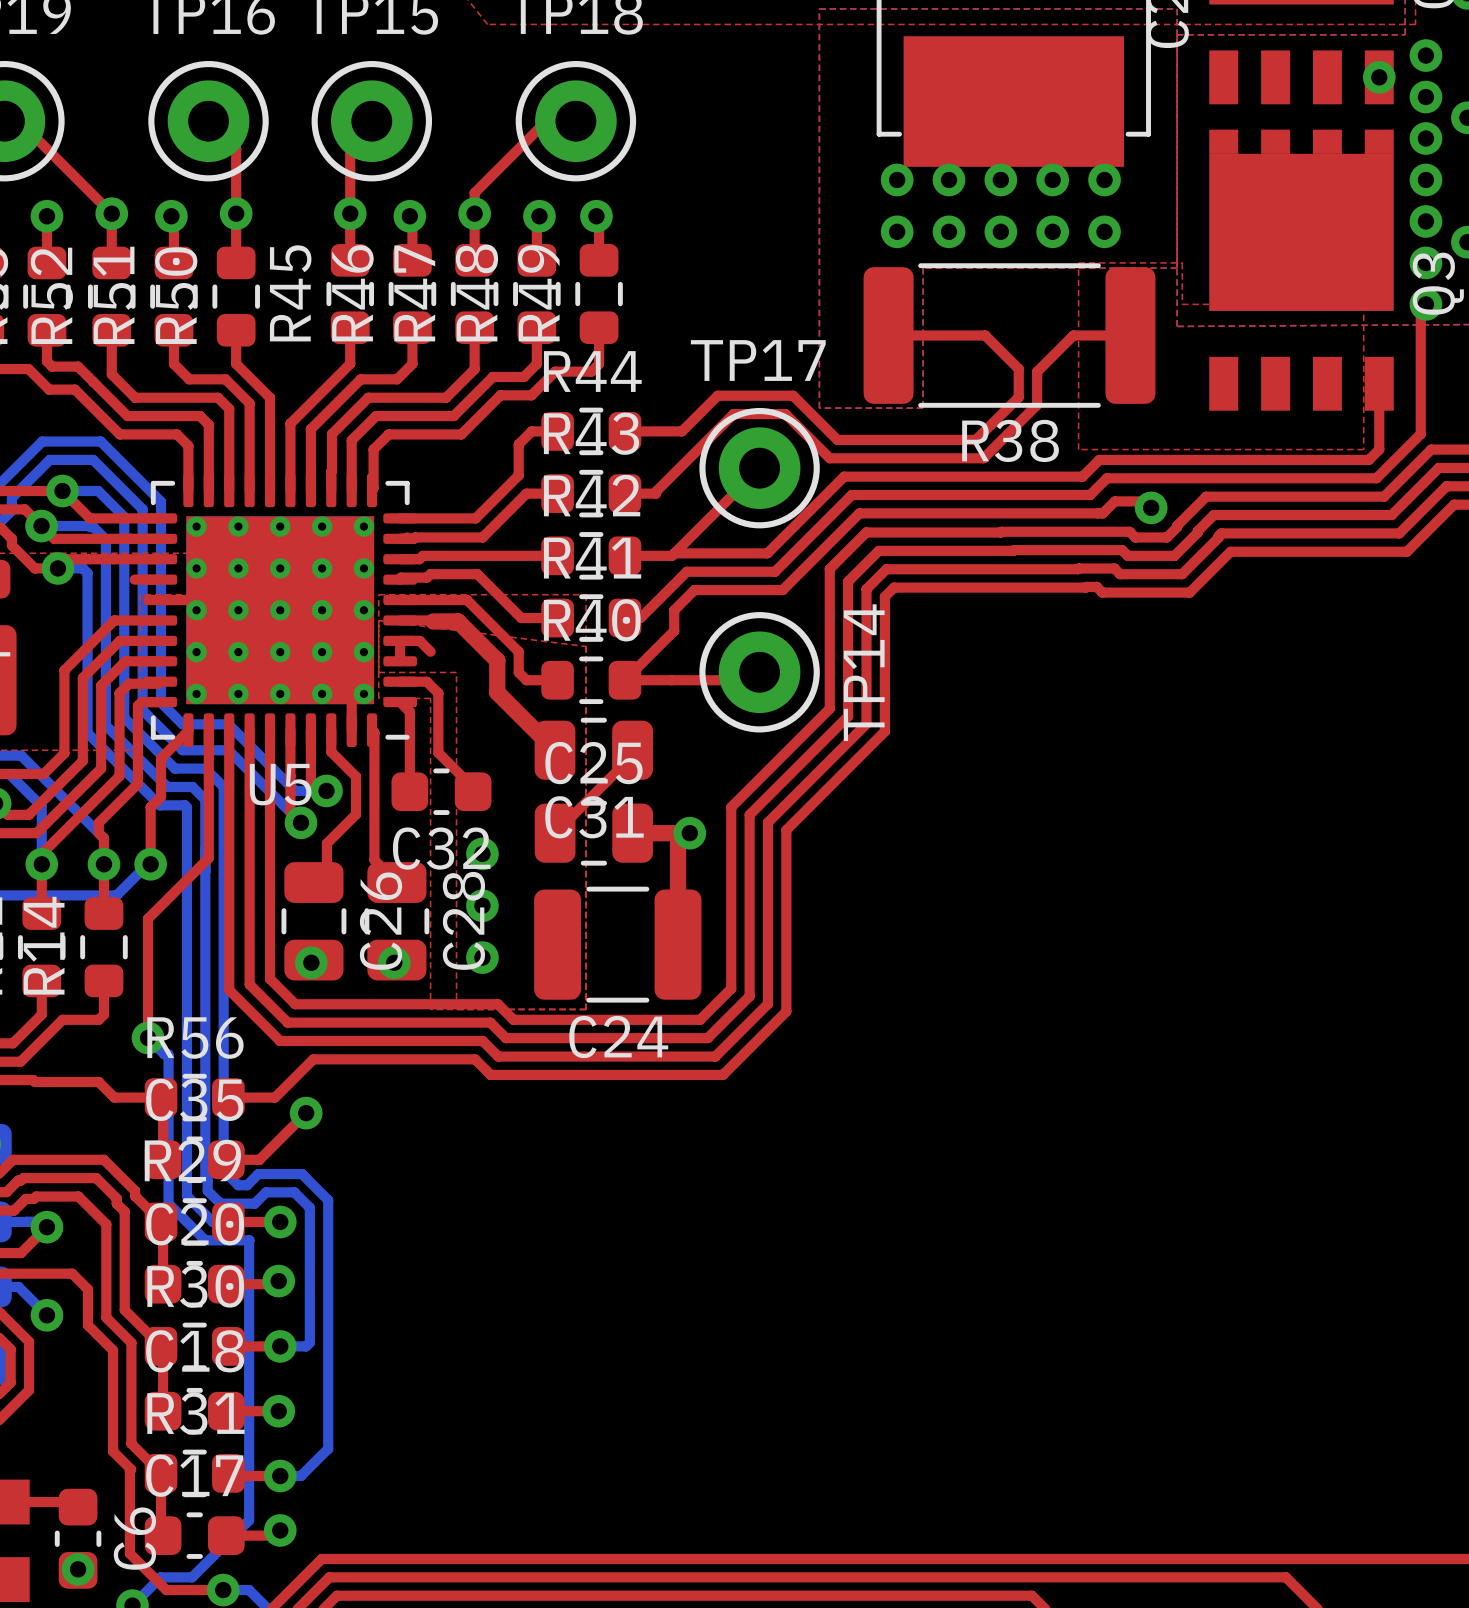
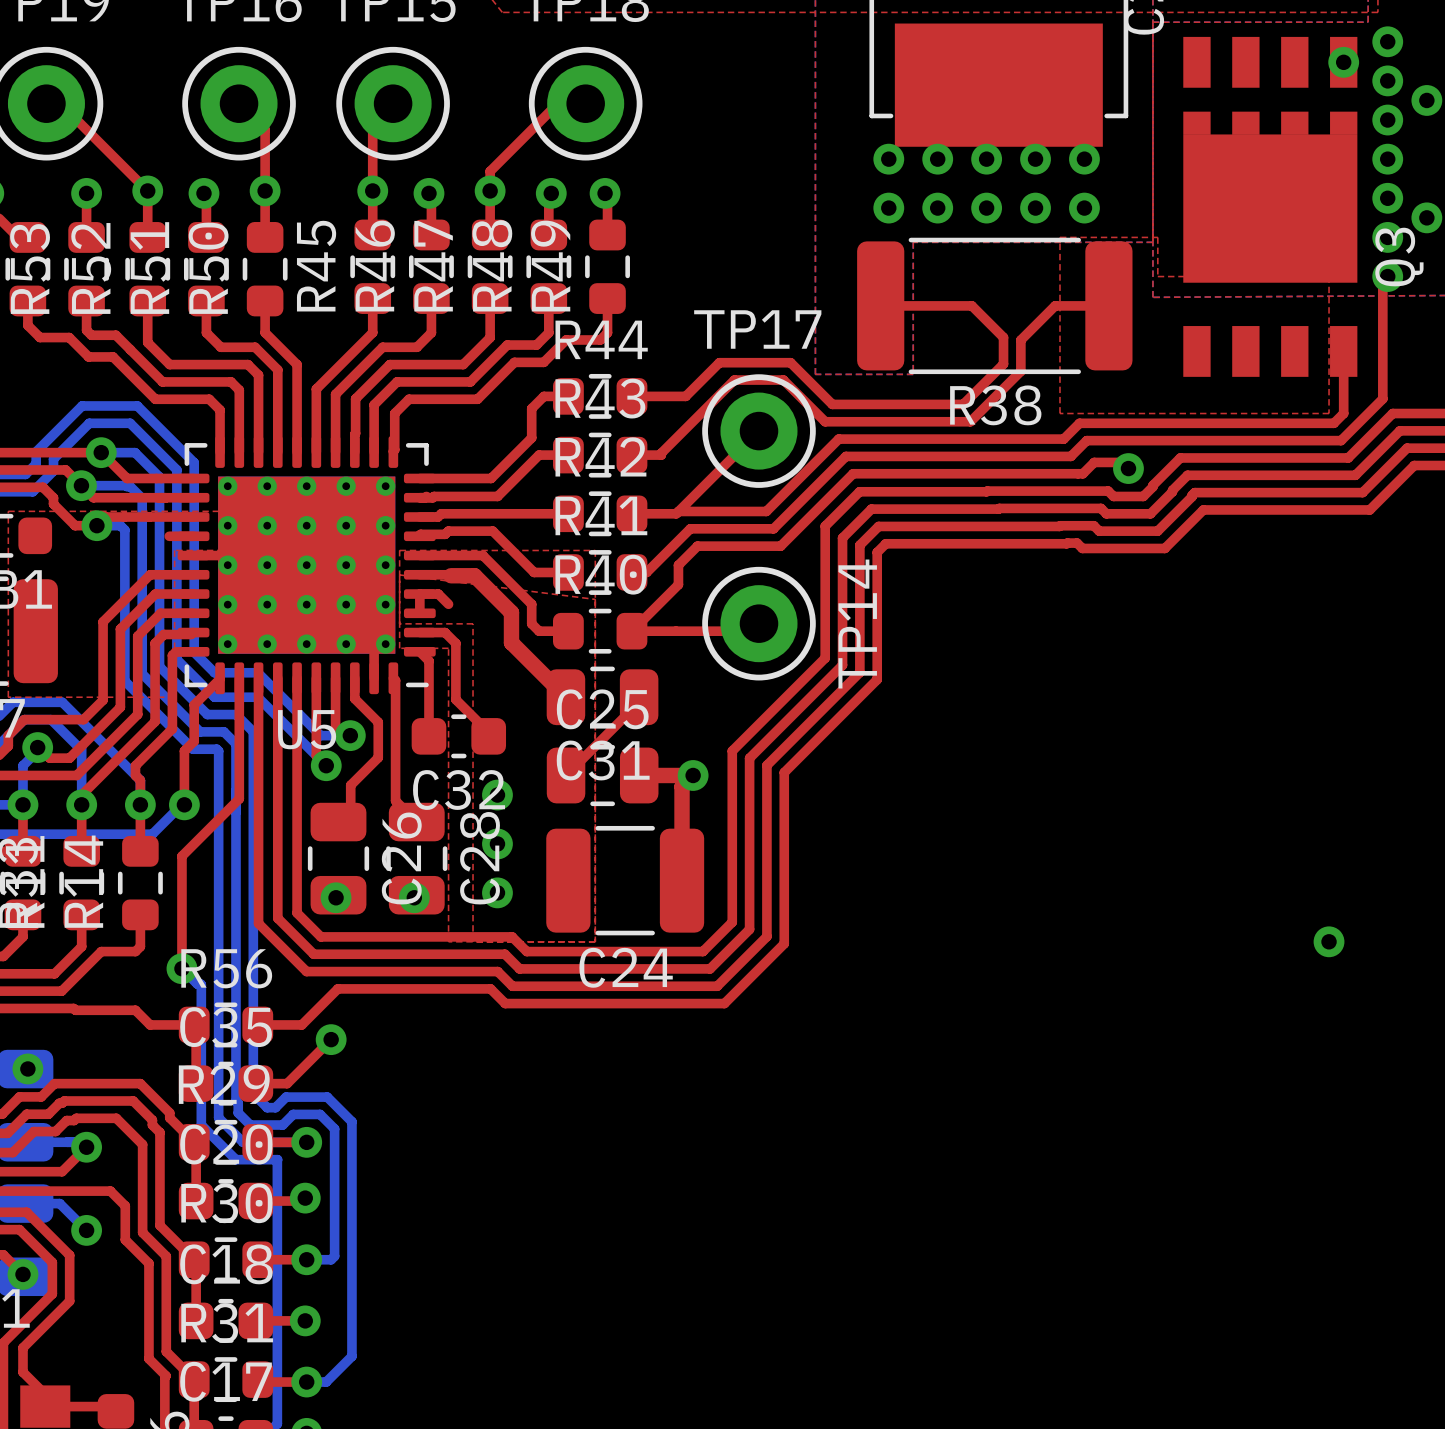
via: none -> (1329, 941)

